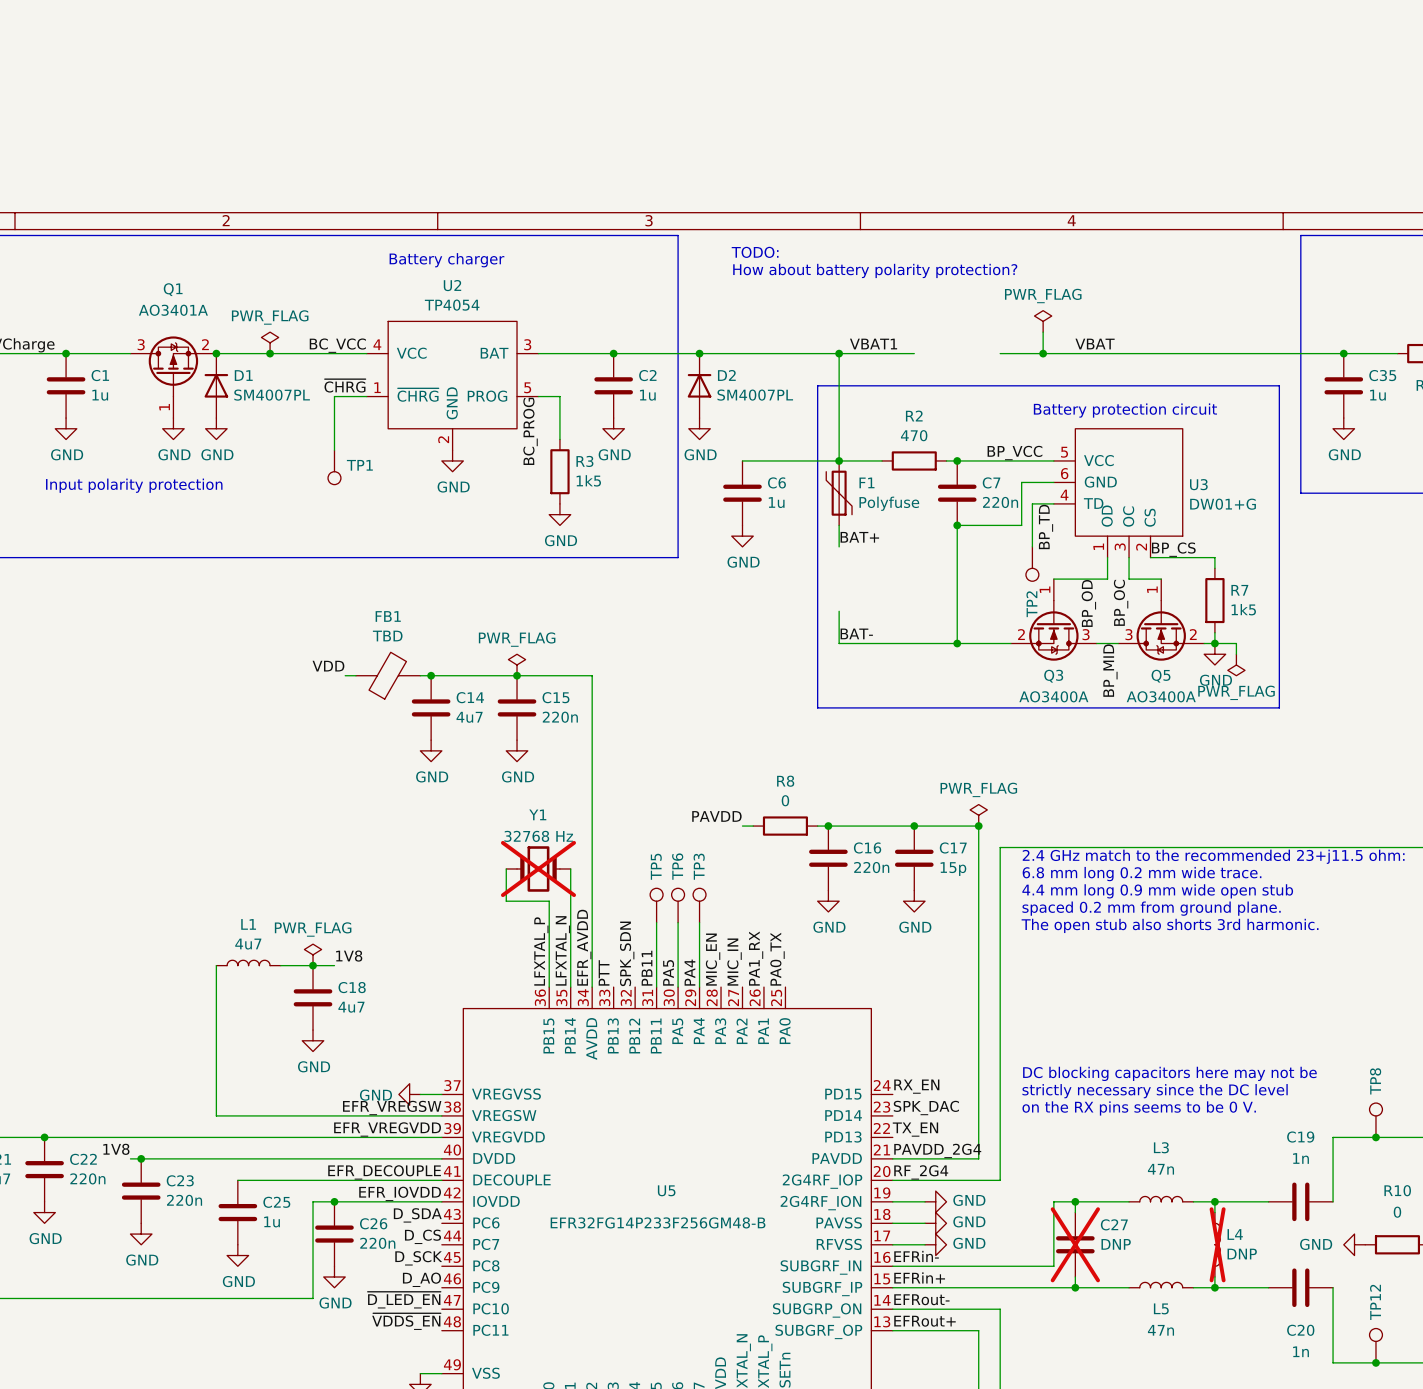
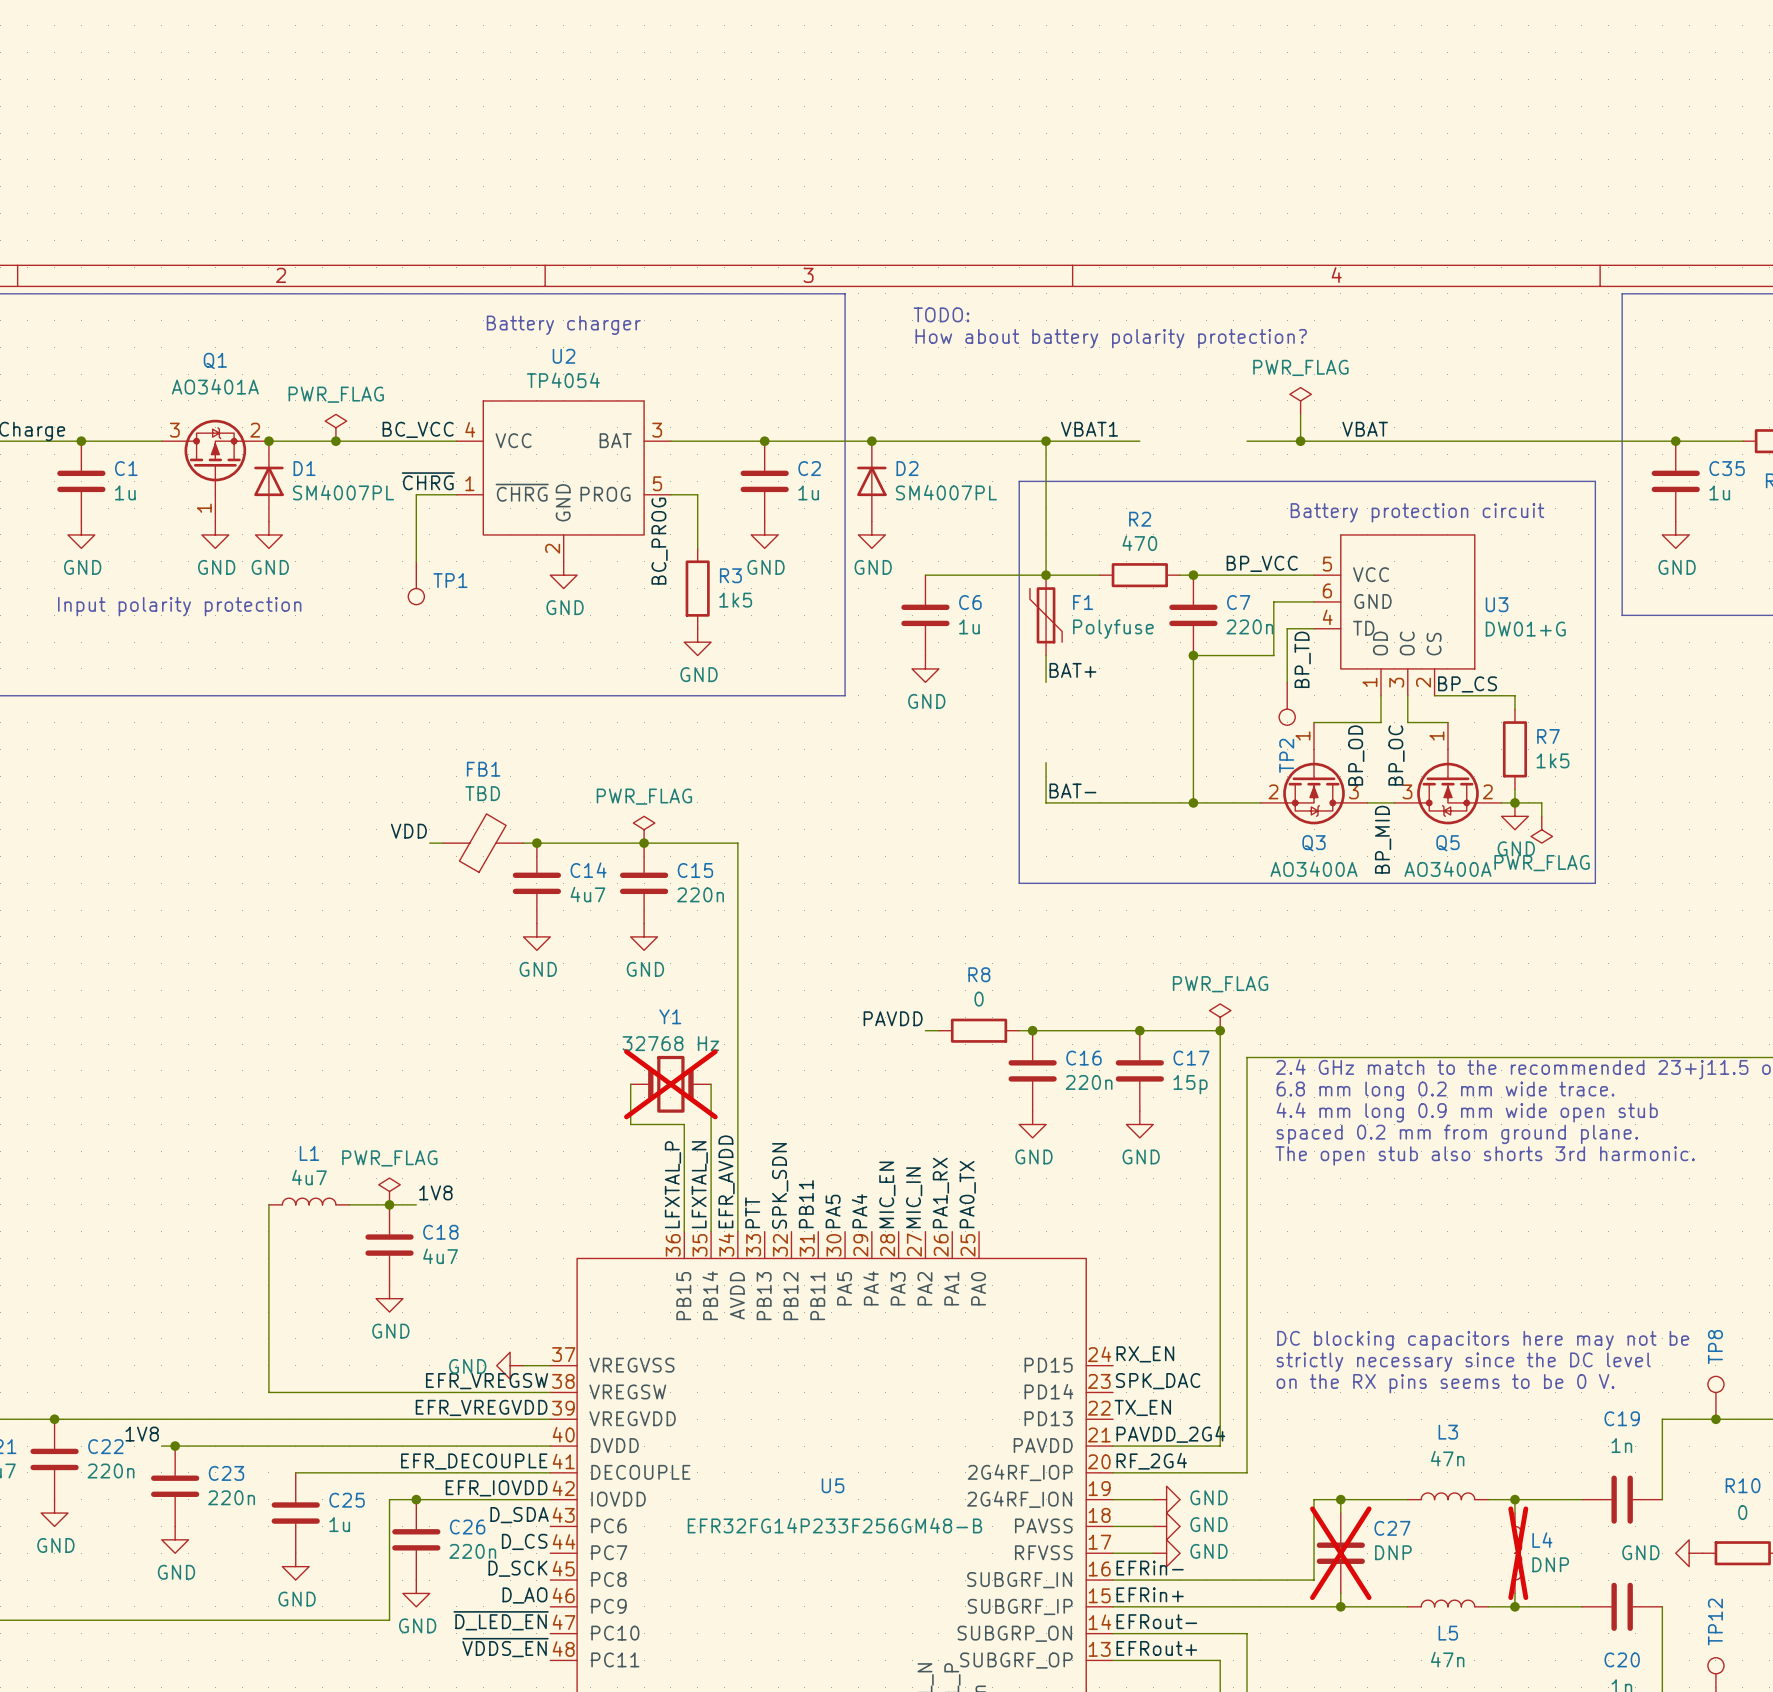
TP5: (656, 905) -> none
TP6: (678, 905) -> none
TP3: (699, 905) -> none
wire: (656, 922) (656, 987) -> none
wire: (678, 922) (678, 987) -> none
wire: (699, 922) (699, 987) -> none

